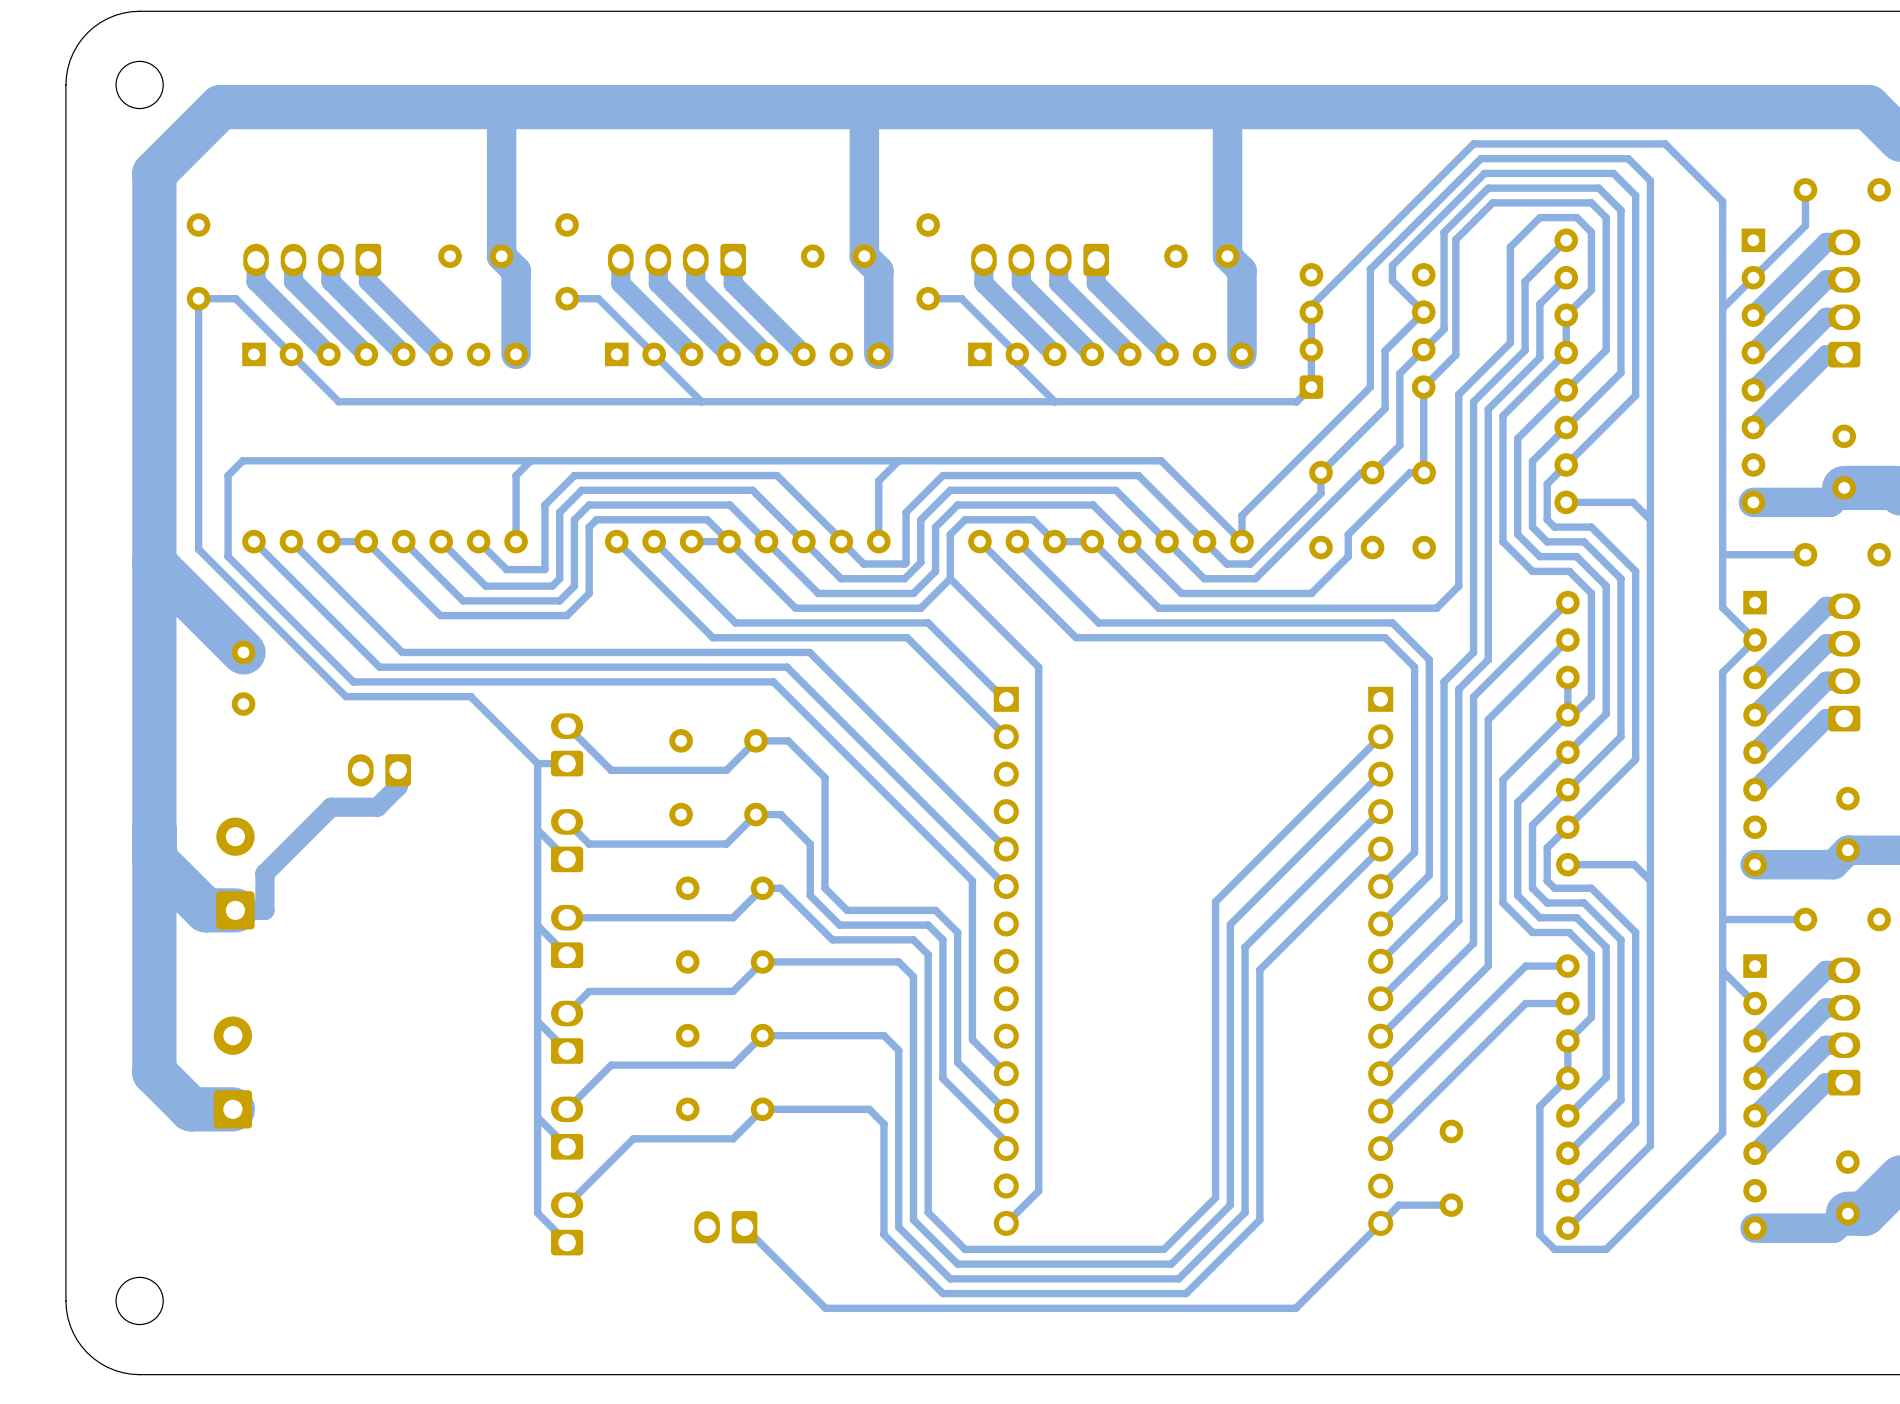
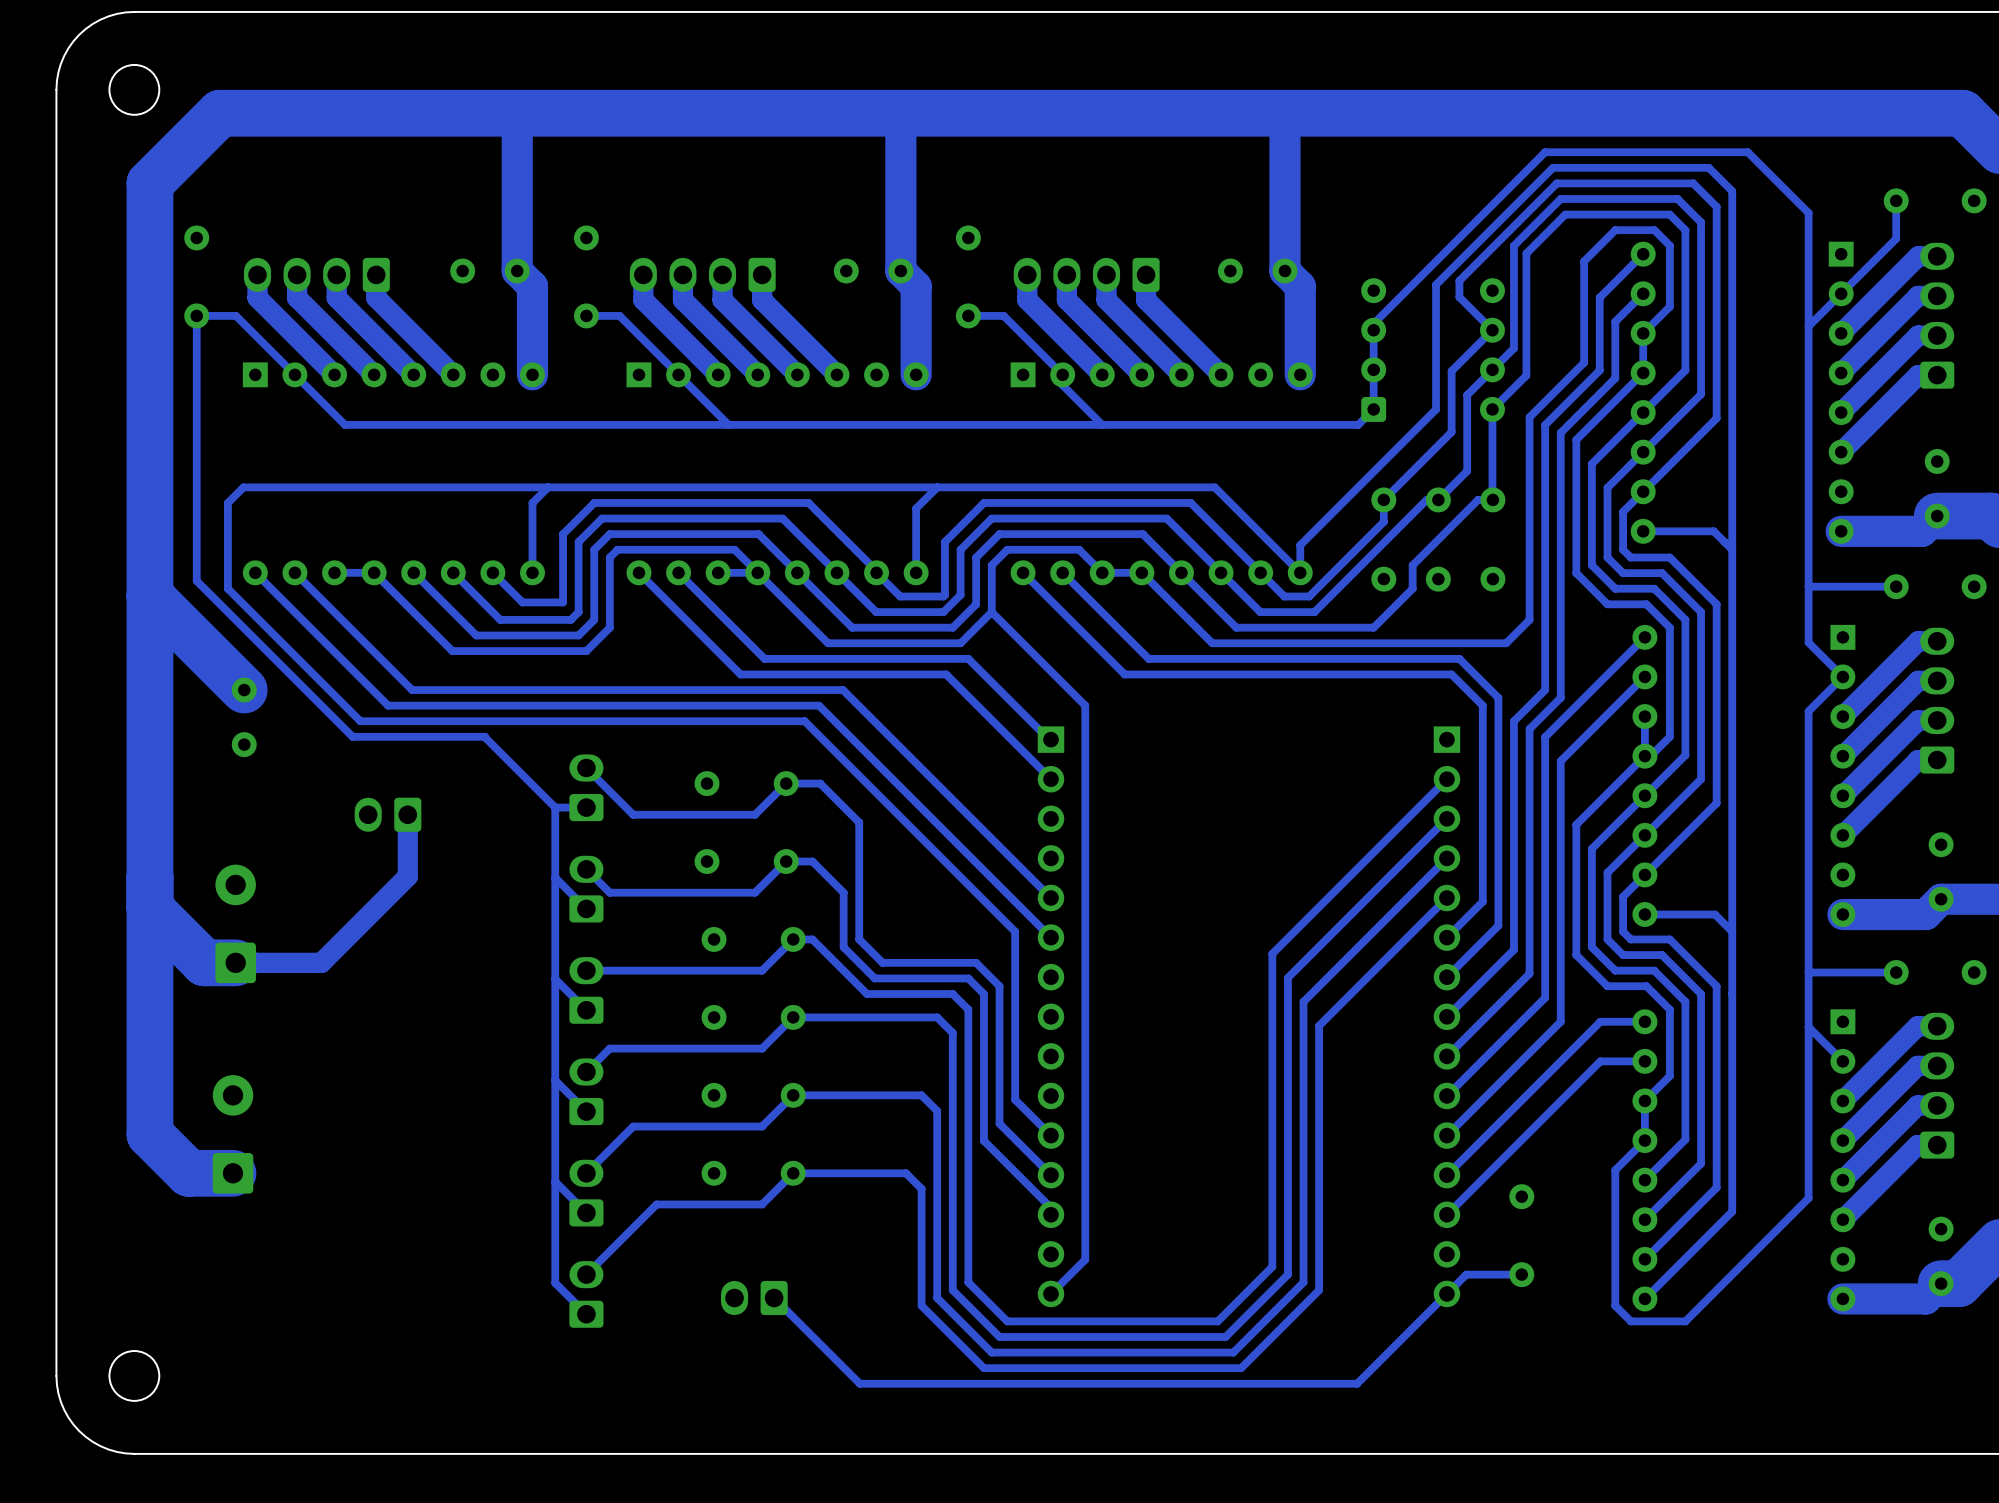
bottom track: (398, 786) (377, 807) (331, 807) (264, 873) (264, 910) -> (407, 831) (407, 876) (321, 962) (266, 962)

